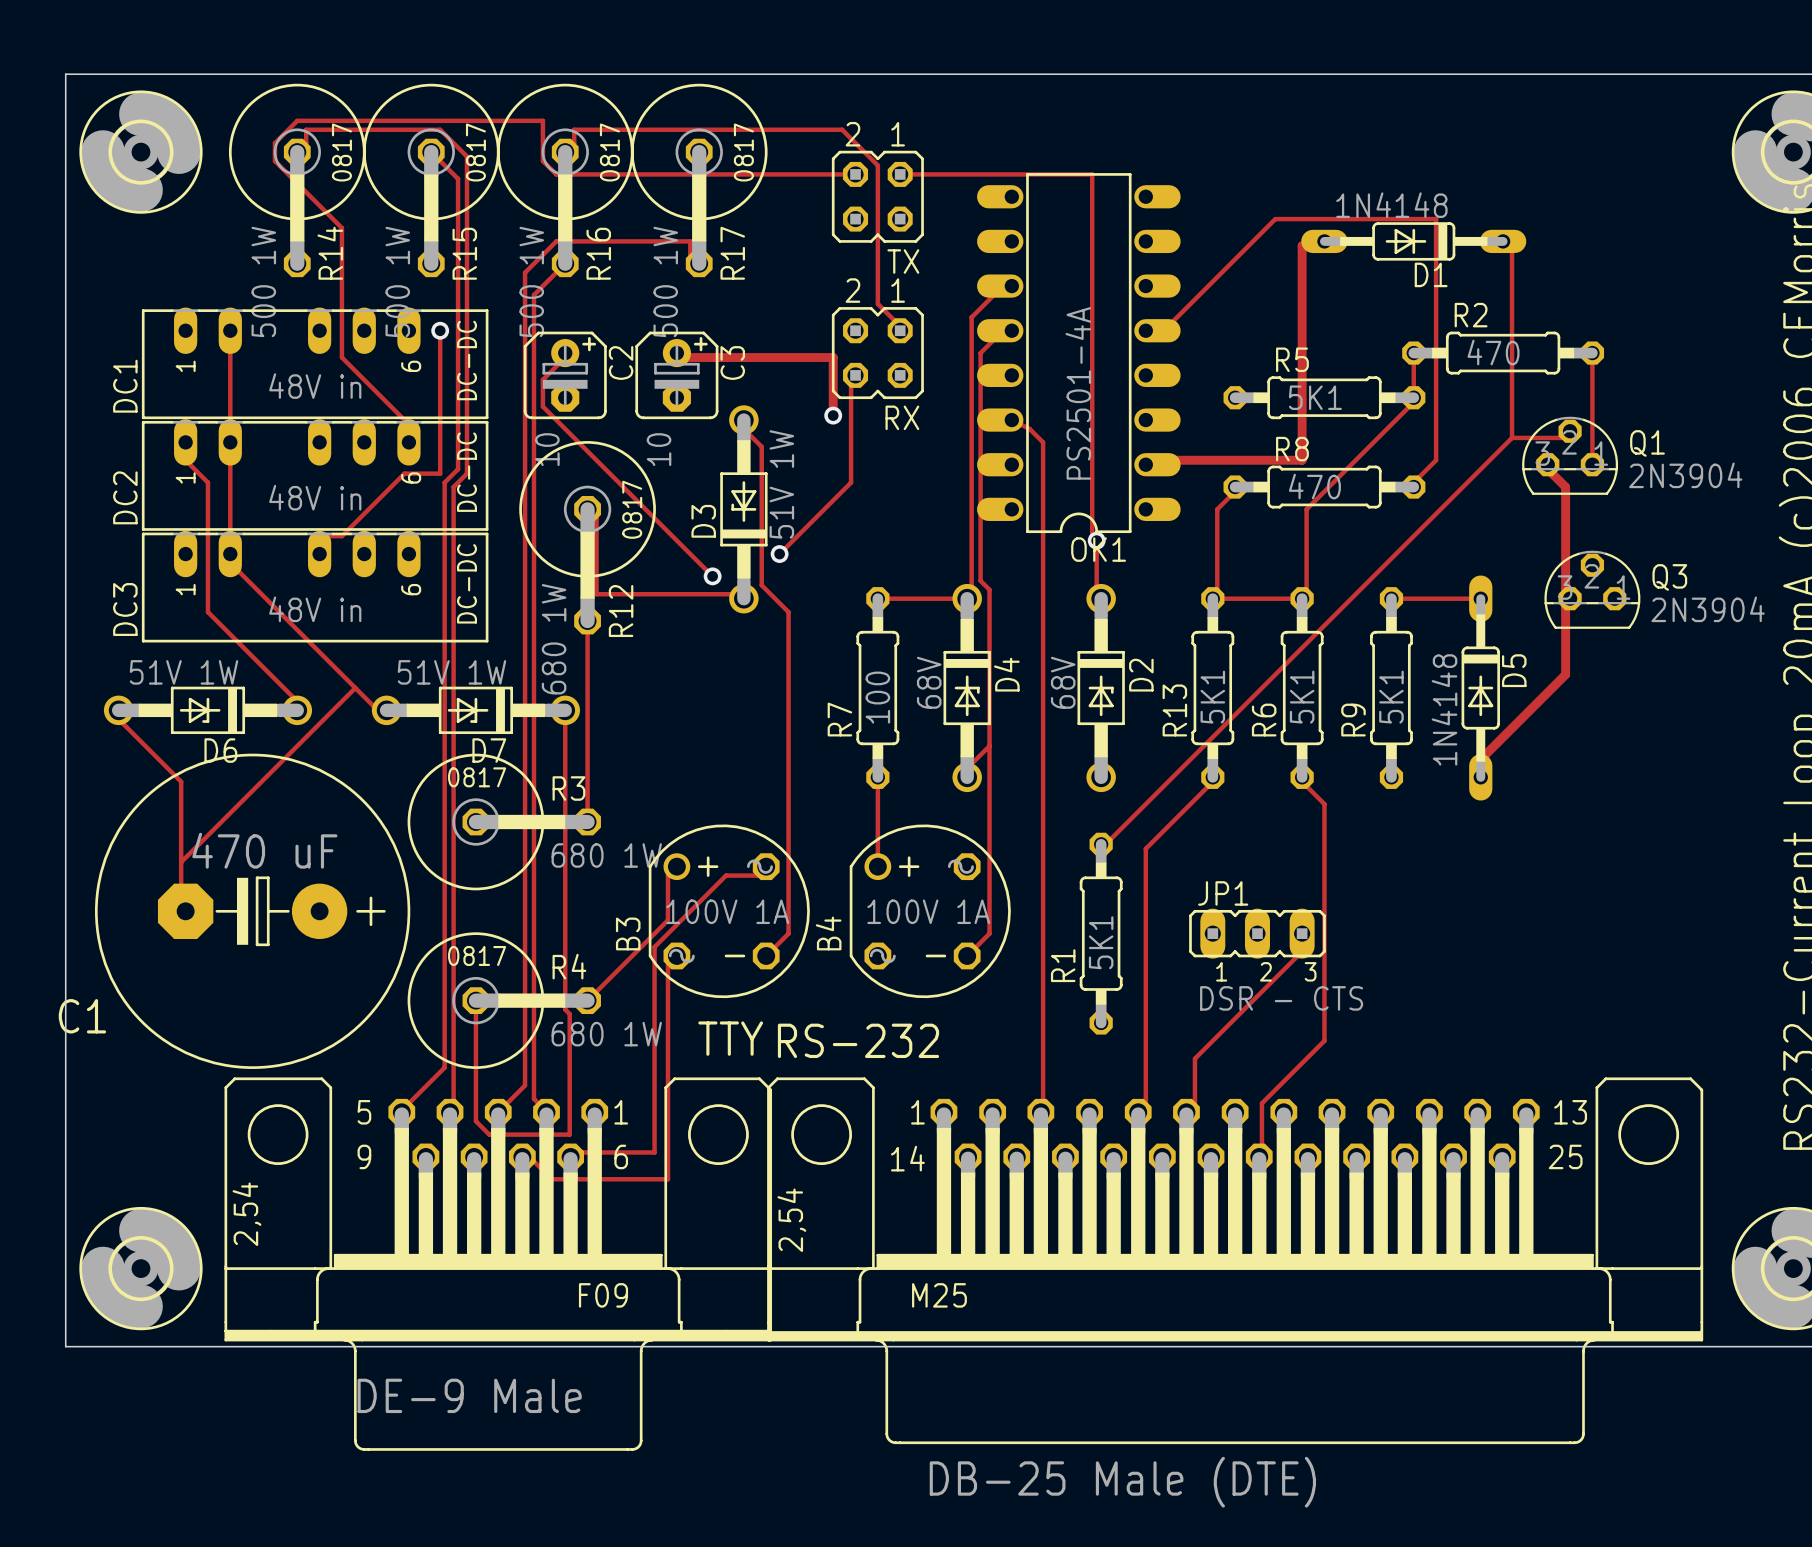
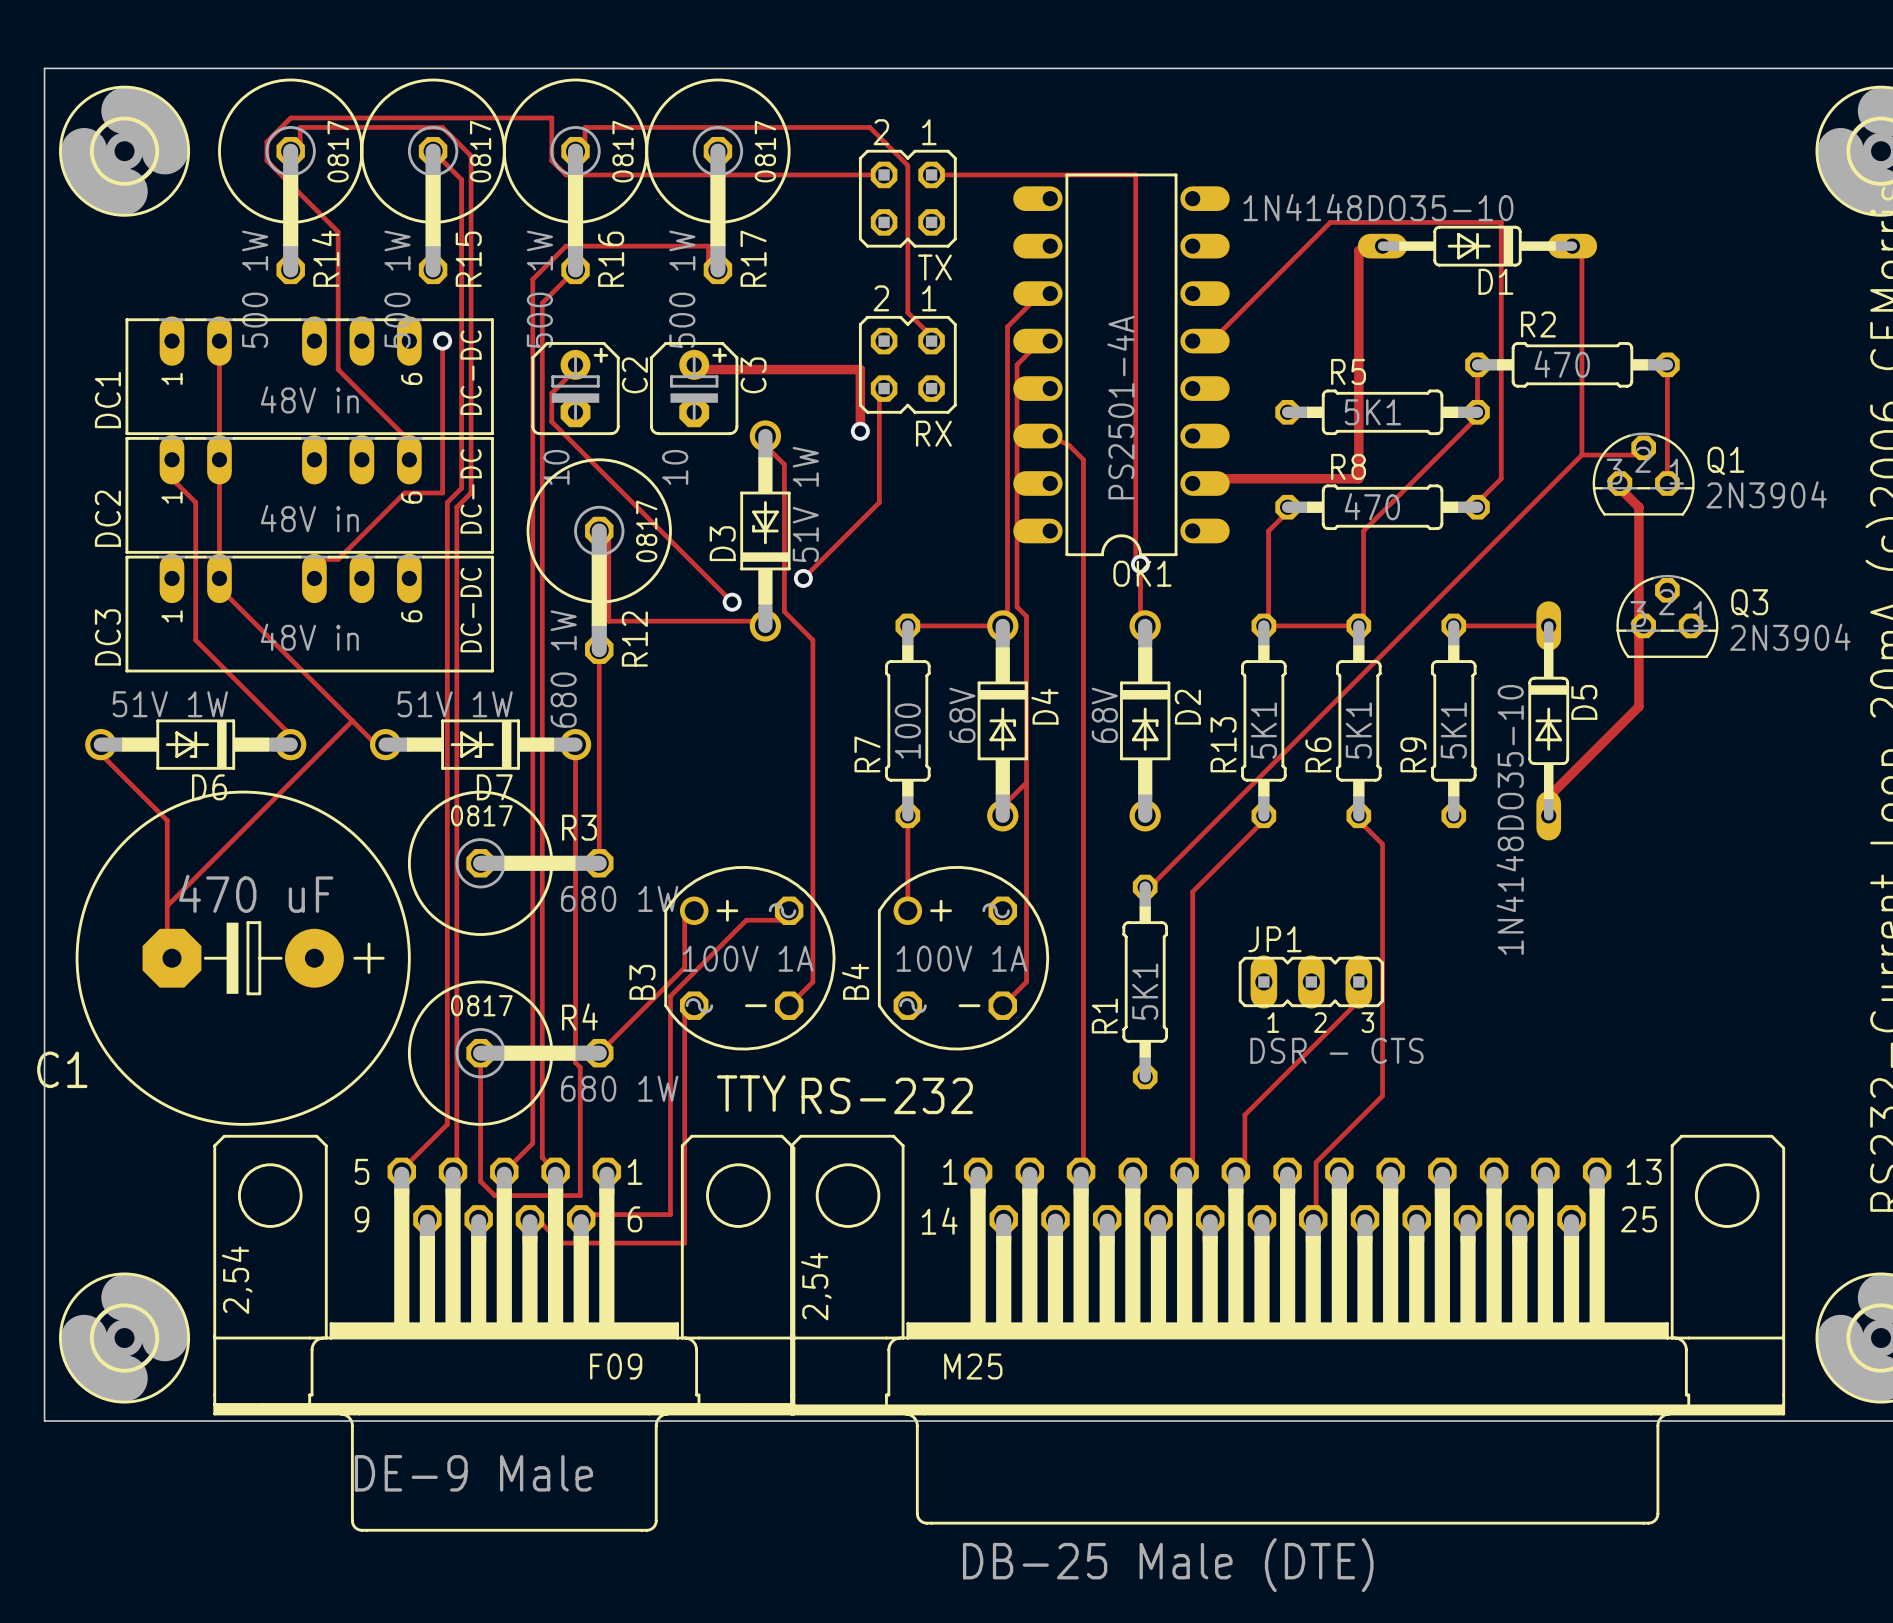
D1 value: 1N4148 (1391, 205) -> 1N4148DO35-10 (1378, 207)
D5 value: 1N4148 (1444, 709) -> 1N4148DO35-10 (1510, 819)

